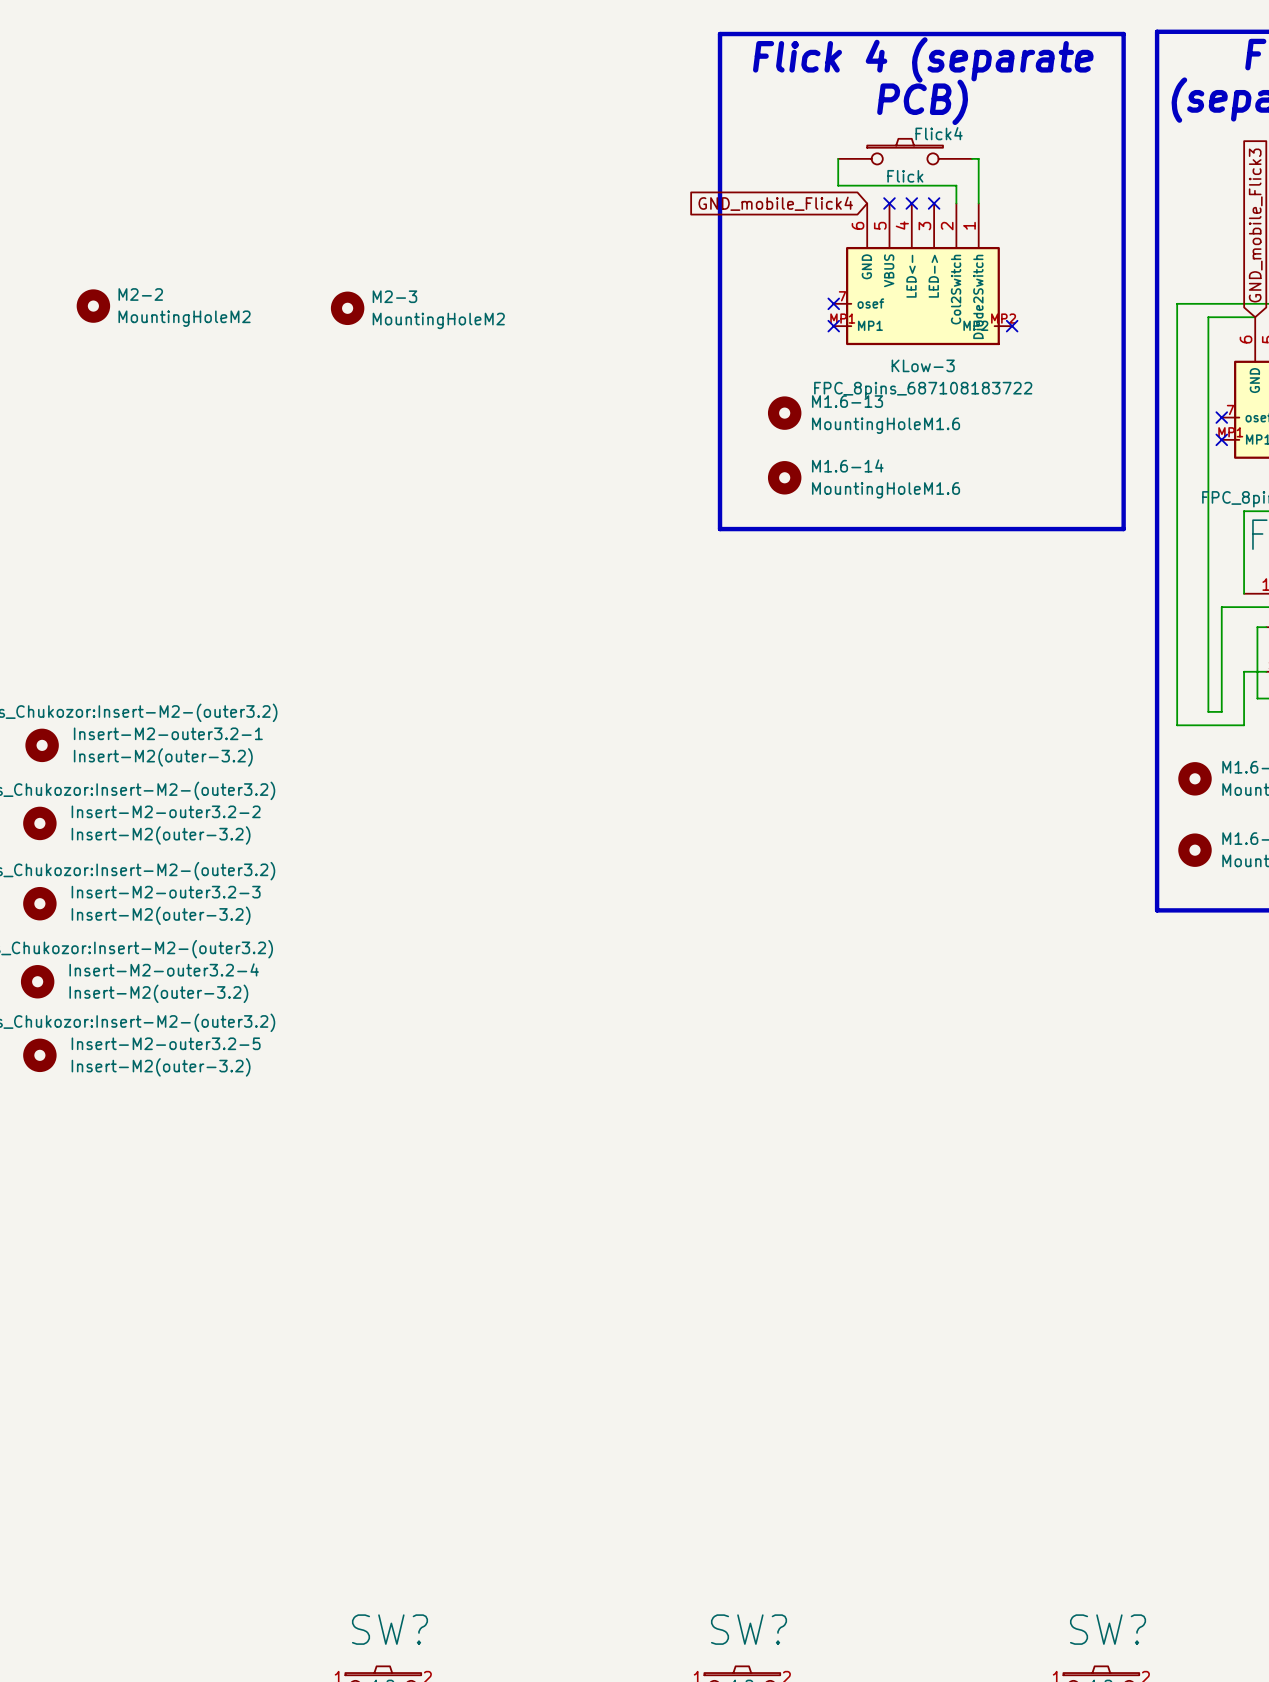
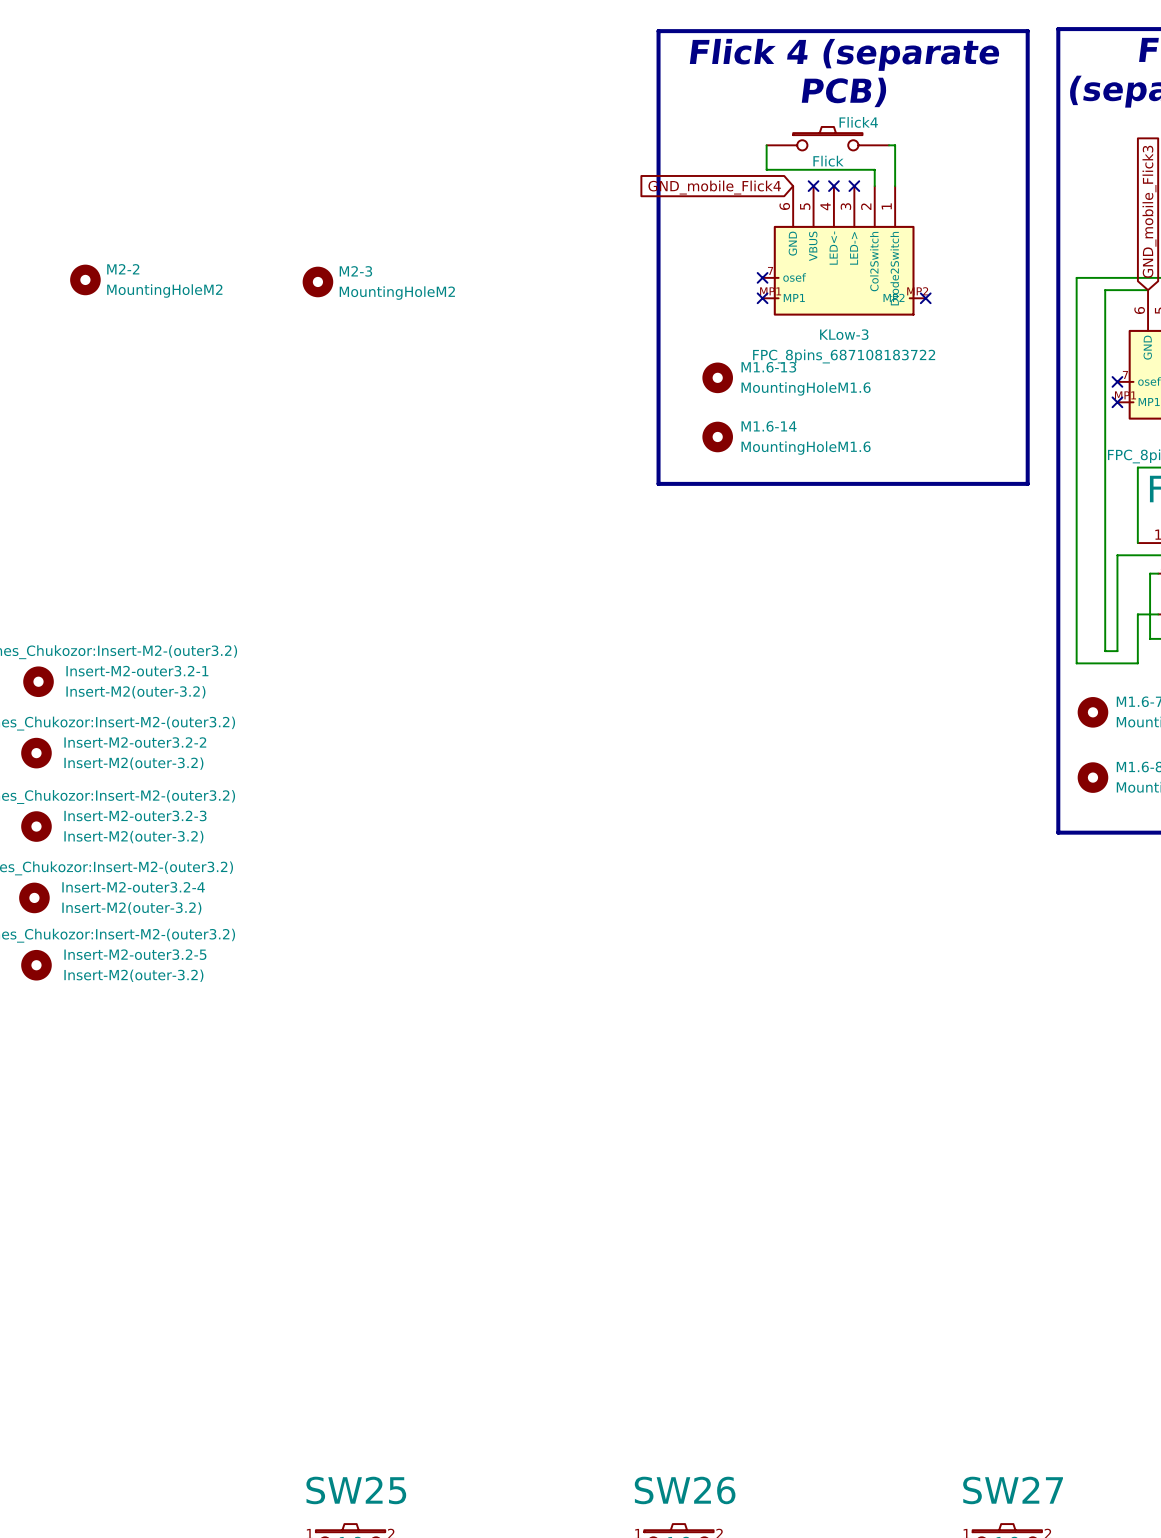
SW? name: SW? (389, 1629) -> SW25 (356, 1490)
SW? name: SW? (749, 1629) -> SW26 (685, 1490)
SW? name: SW? (1108, 1629) -> SW27 (1013, 1490)

